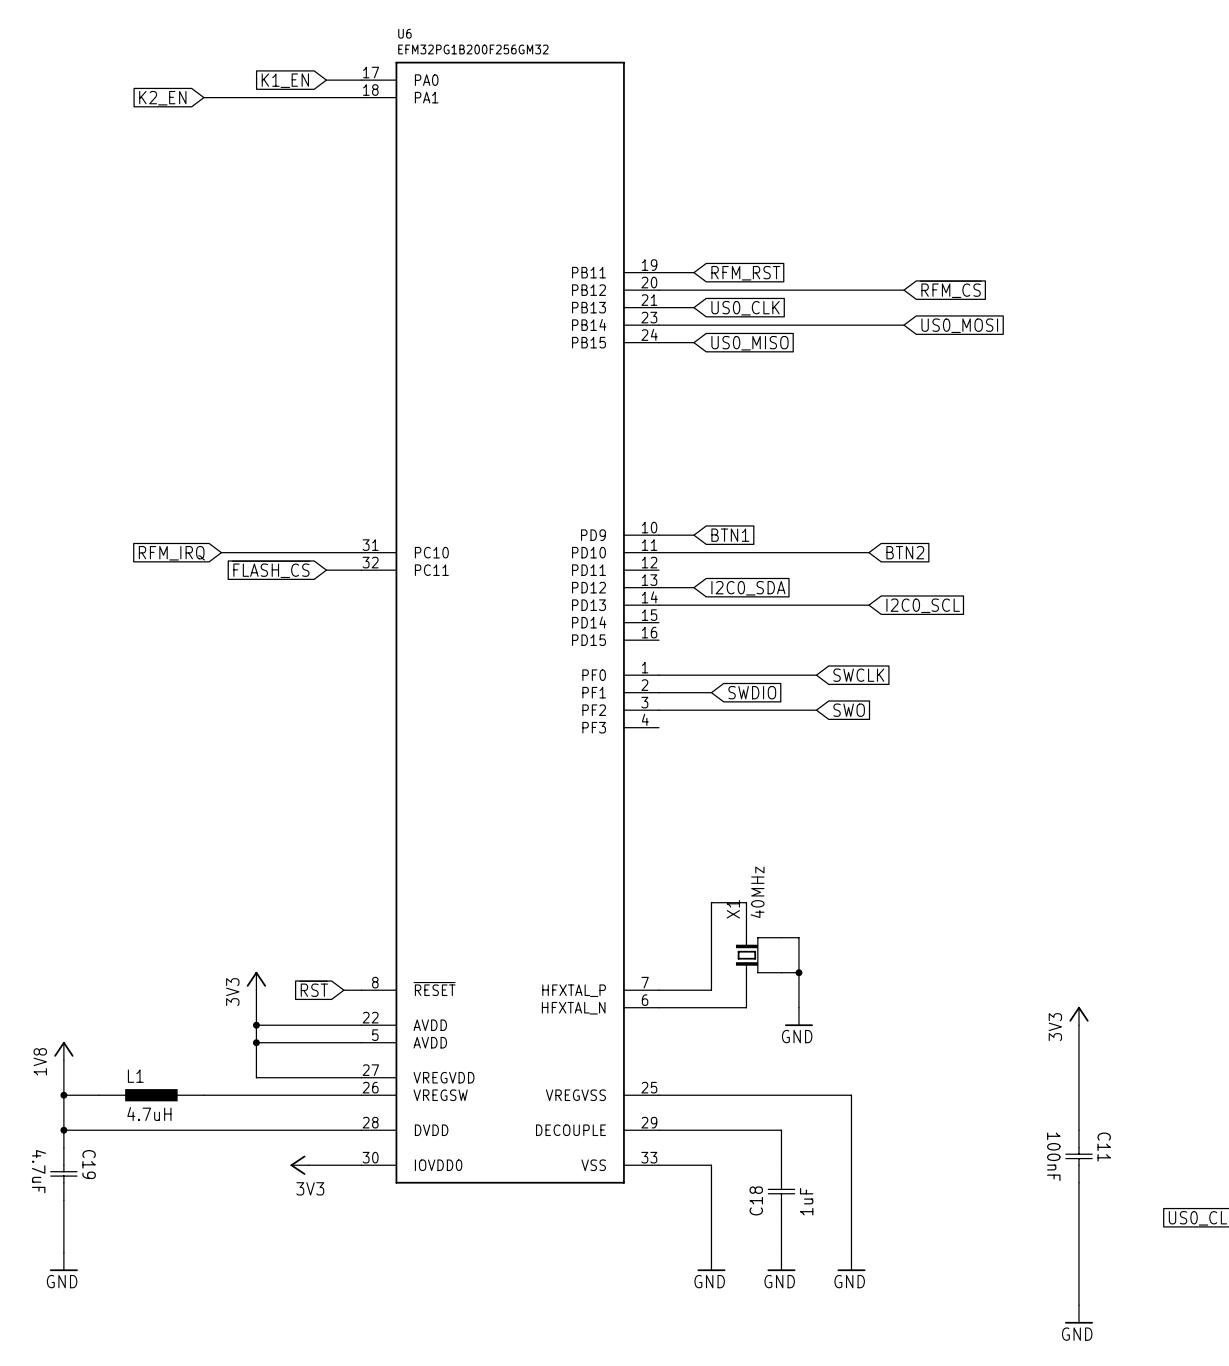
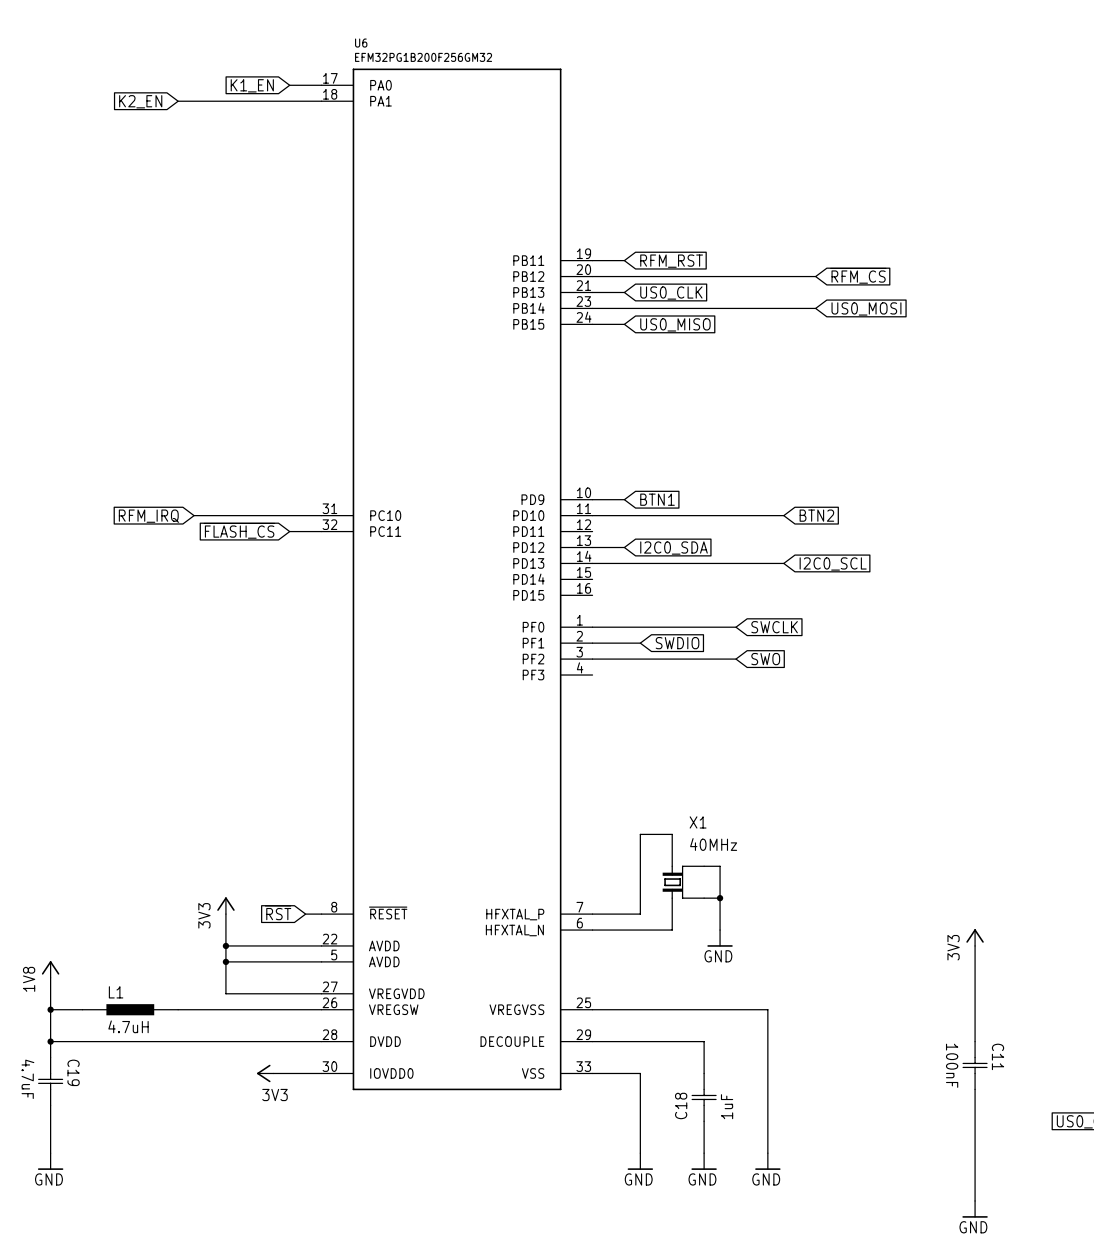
X1 value rotation: 0° (757, 892) -> 90° clockwise (713, 844)
X1 name rotation: 0° (733, 909) -> 90° clockwise (698, 822)
X1 name position: X1 (733, 909) -> X1 (698, 822)

